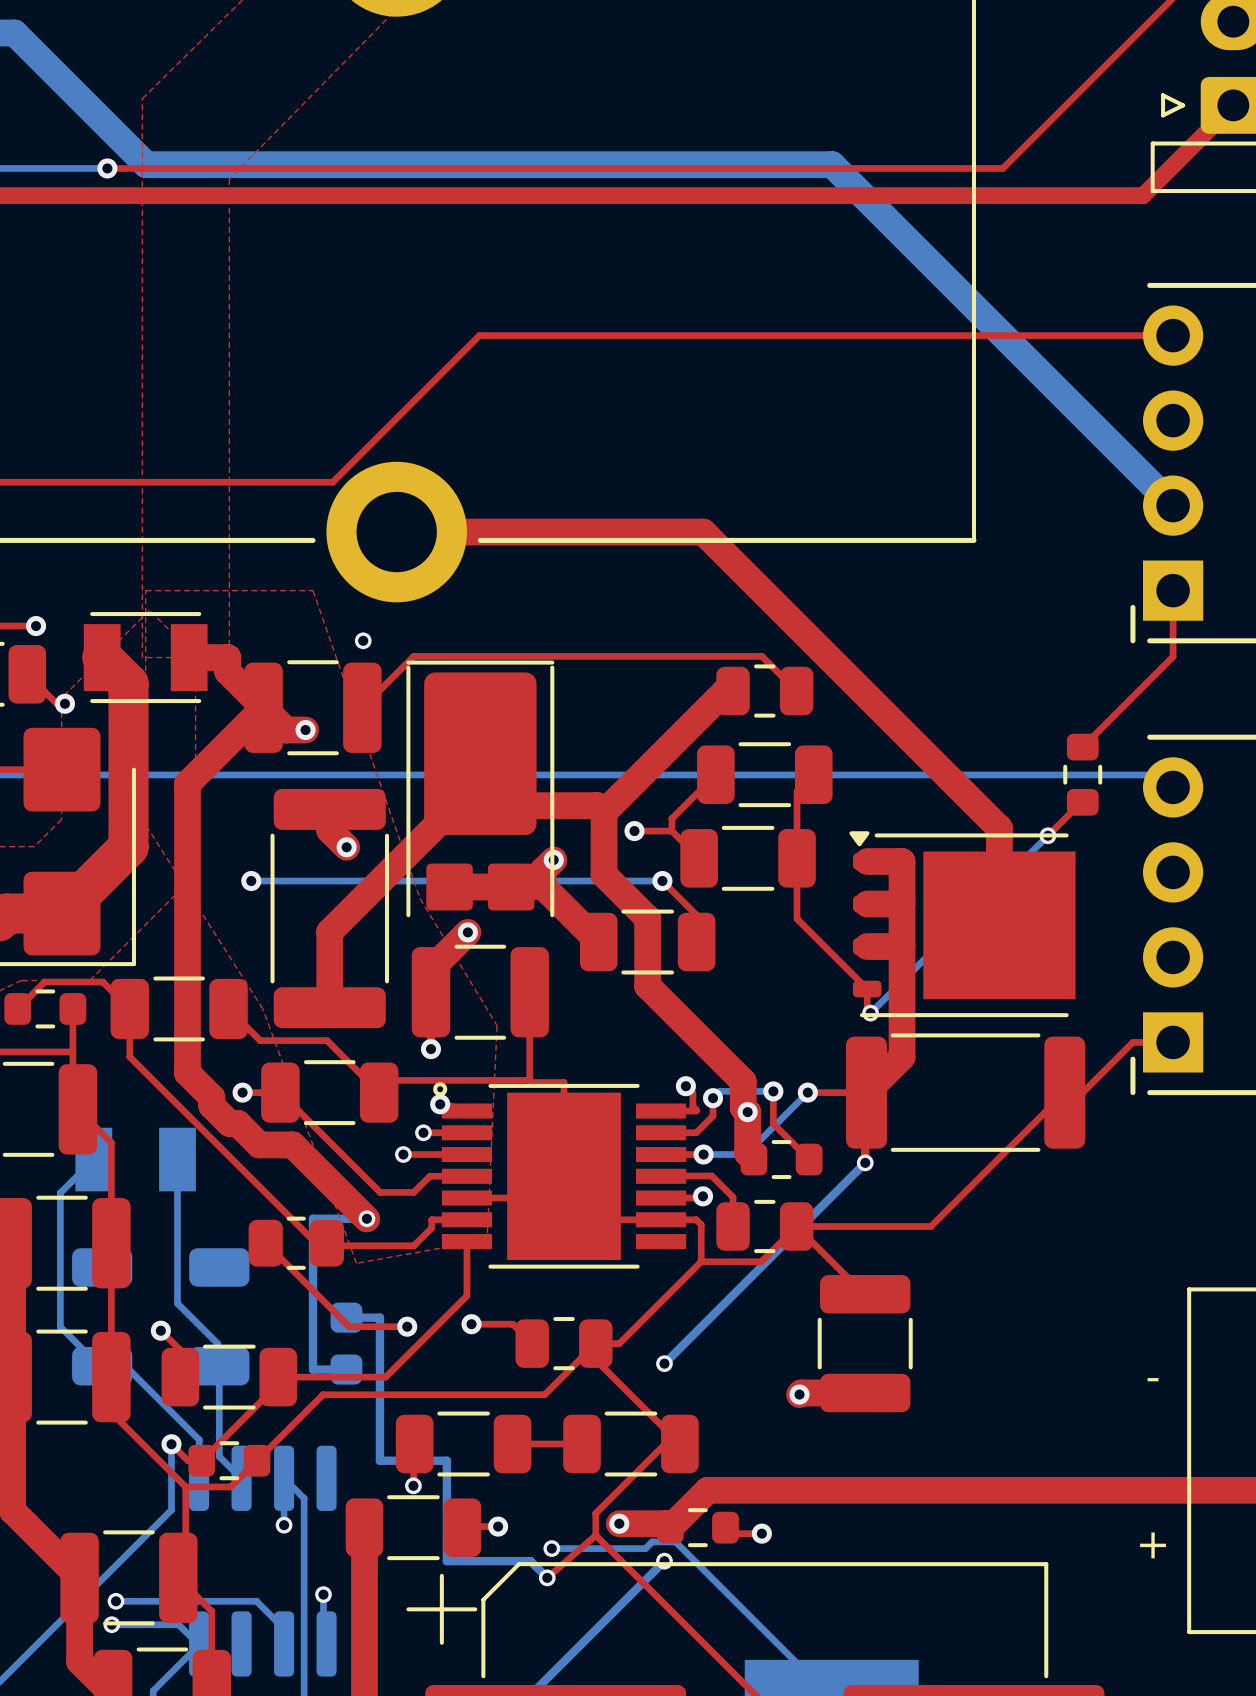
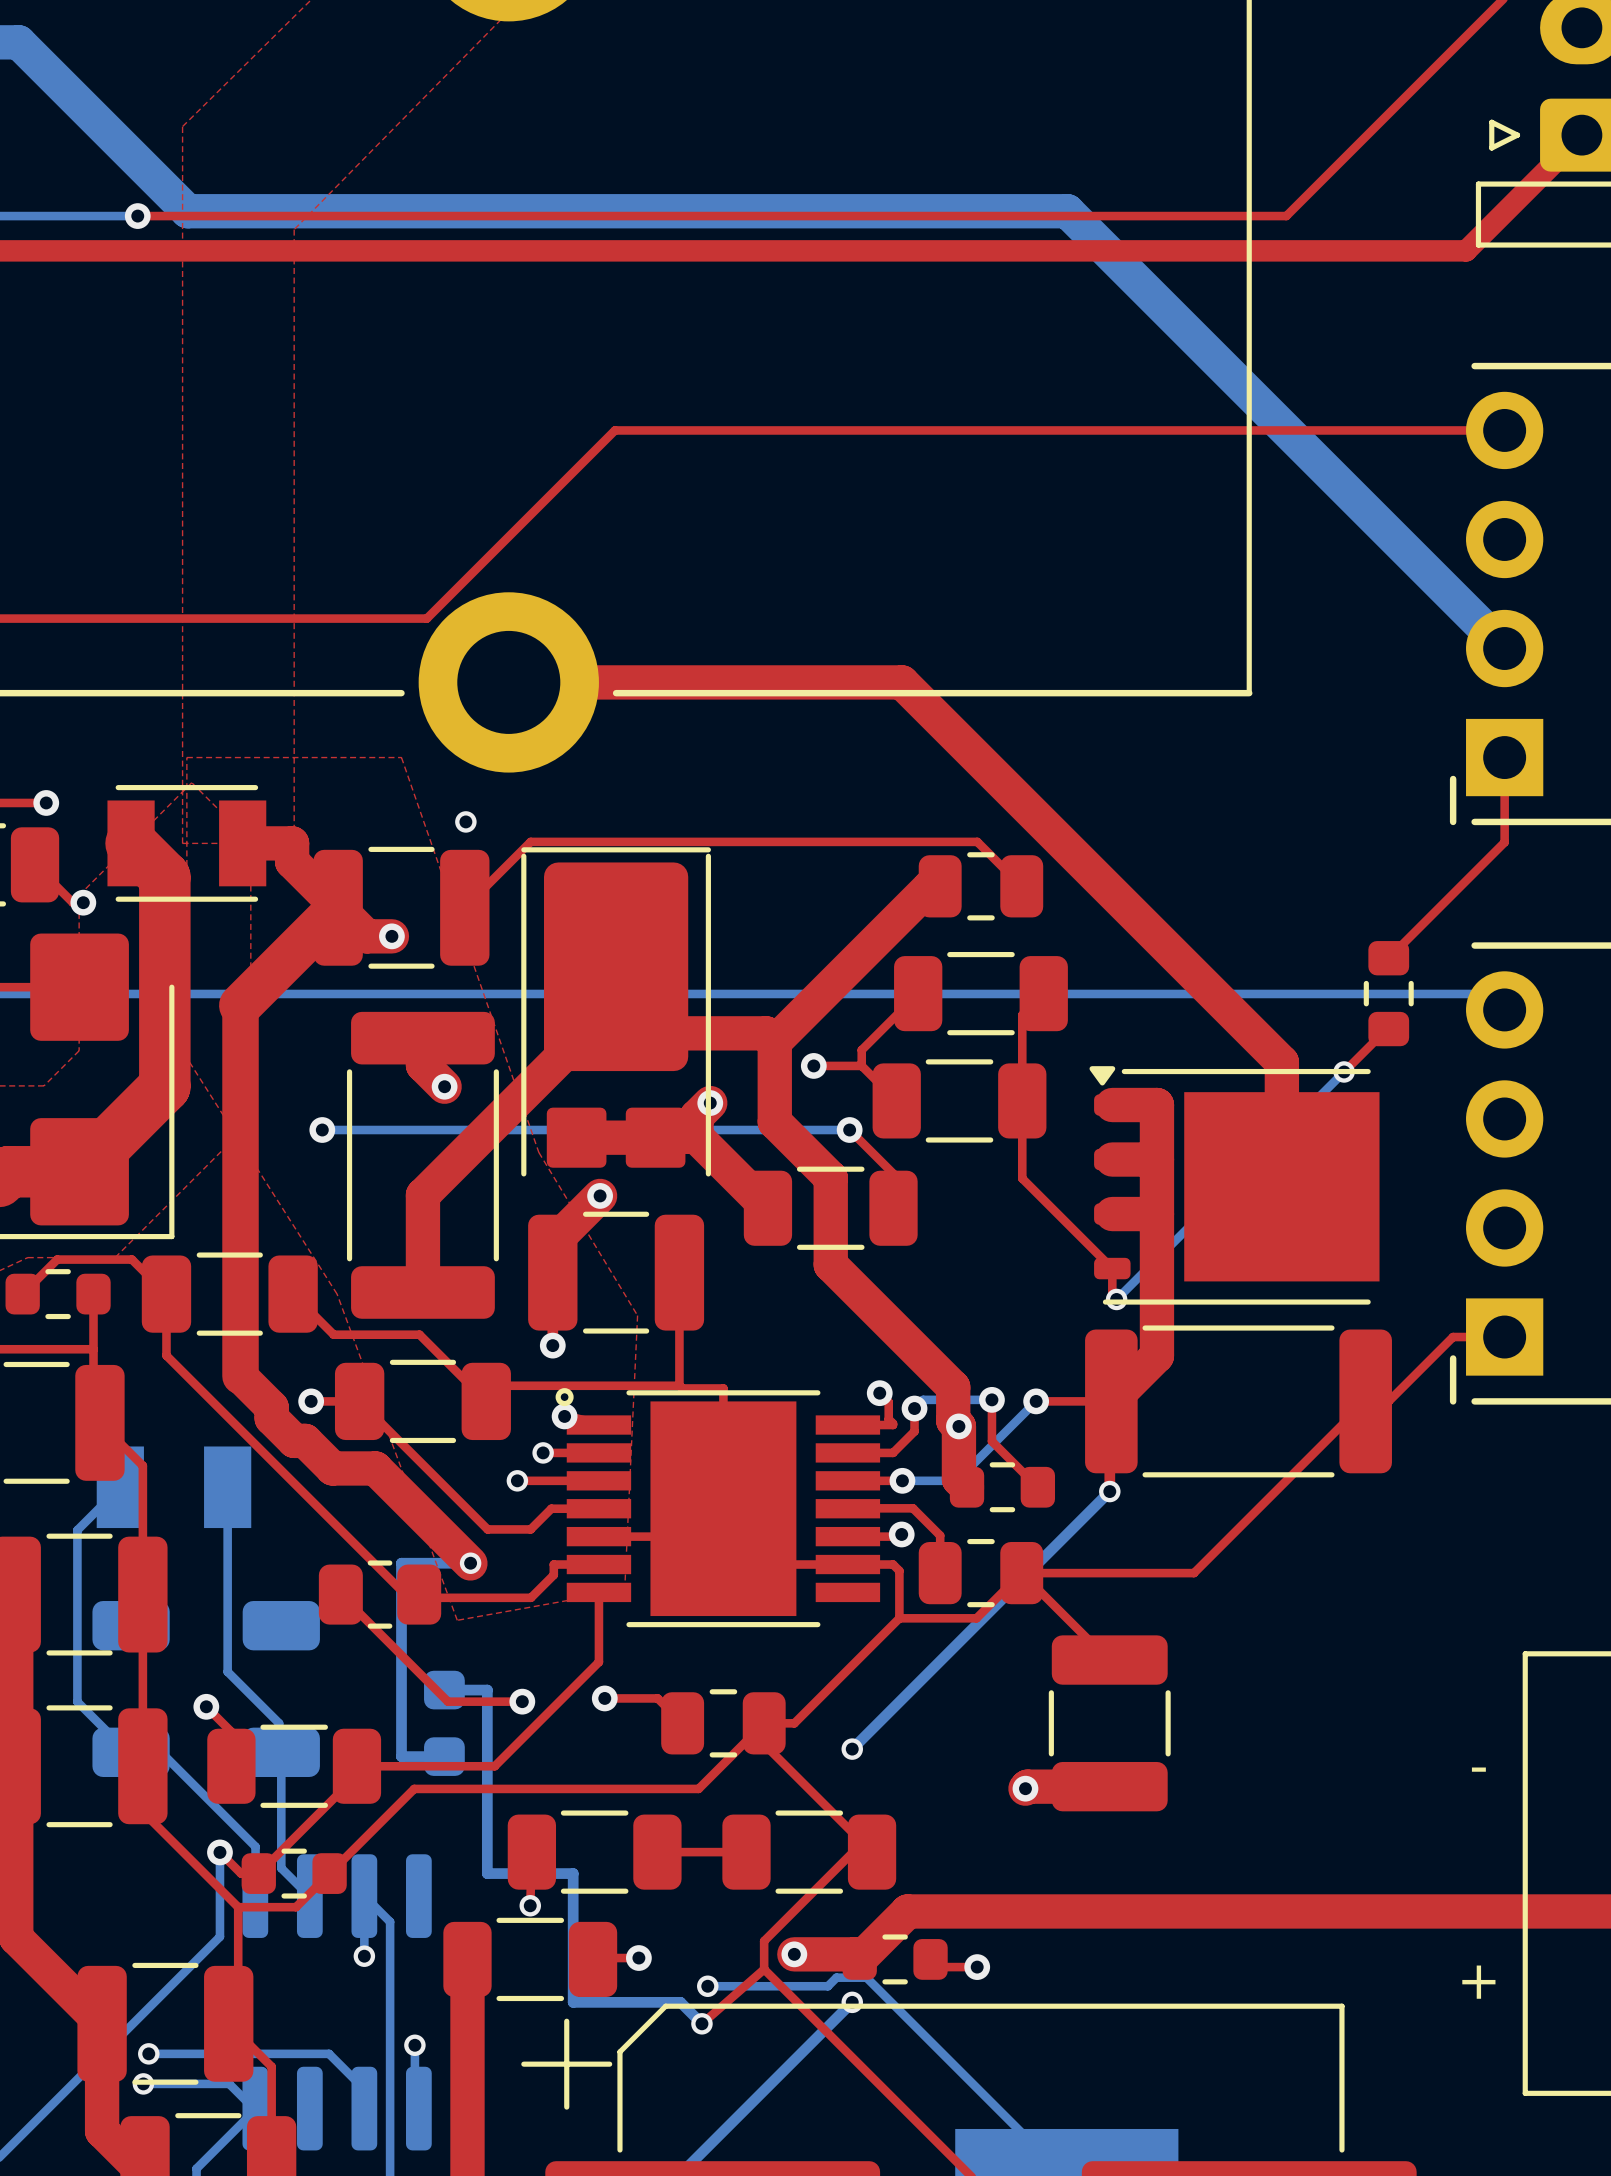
top track width: thin (263, 707) (187, 783) (187, 1073) -> thick (338, 907) (240, 1005) (240, 1376)

